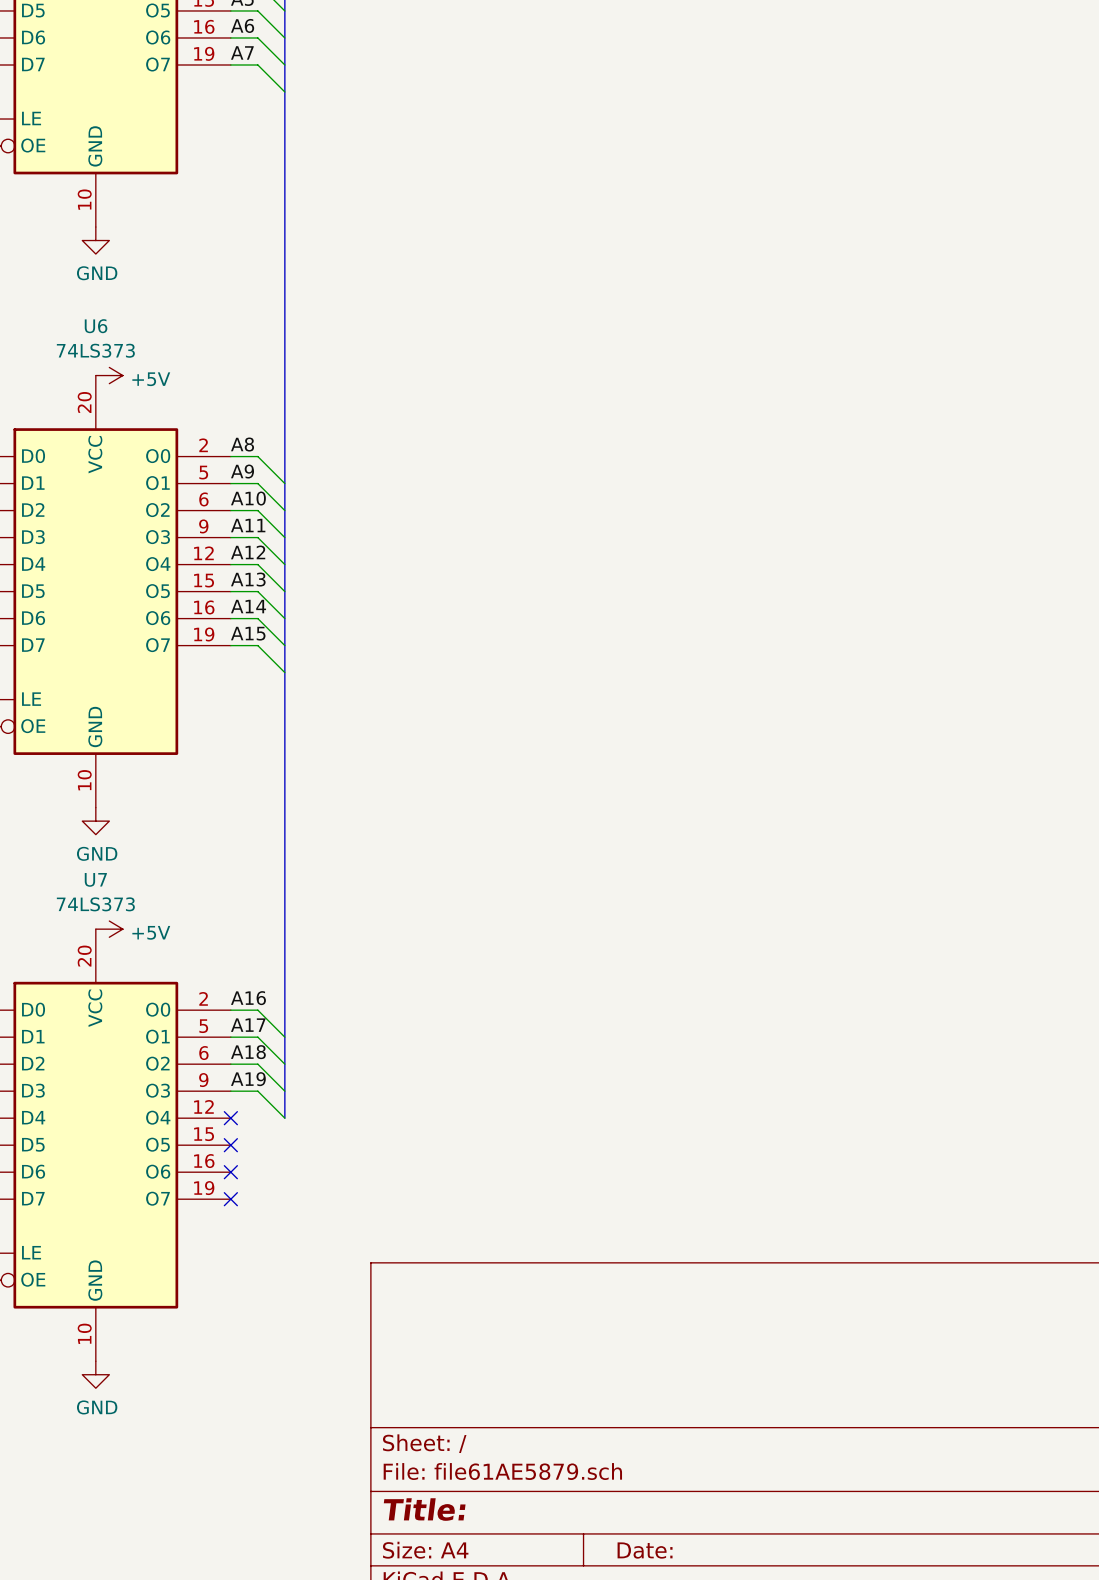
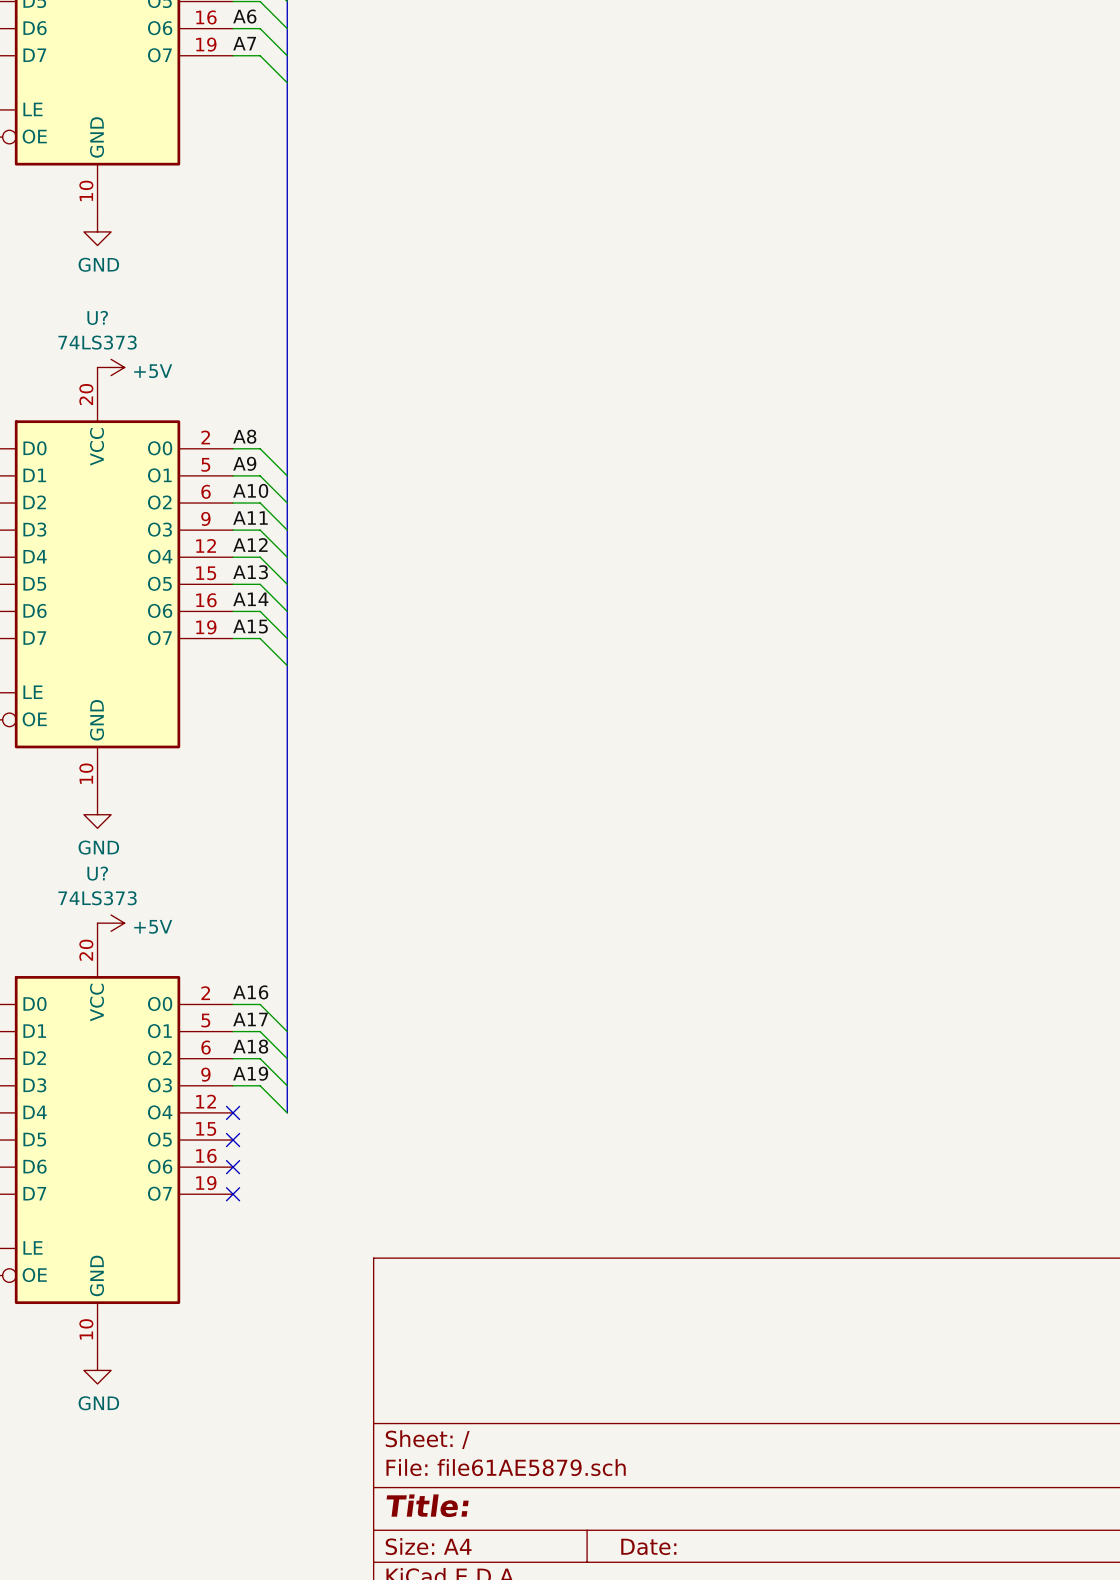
U6 name: U6 (96, 326) -> U? (97, 317)
U7 name: U7 (95, 879) -> U? (97, 873)

